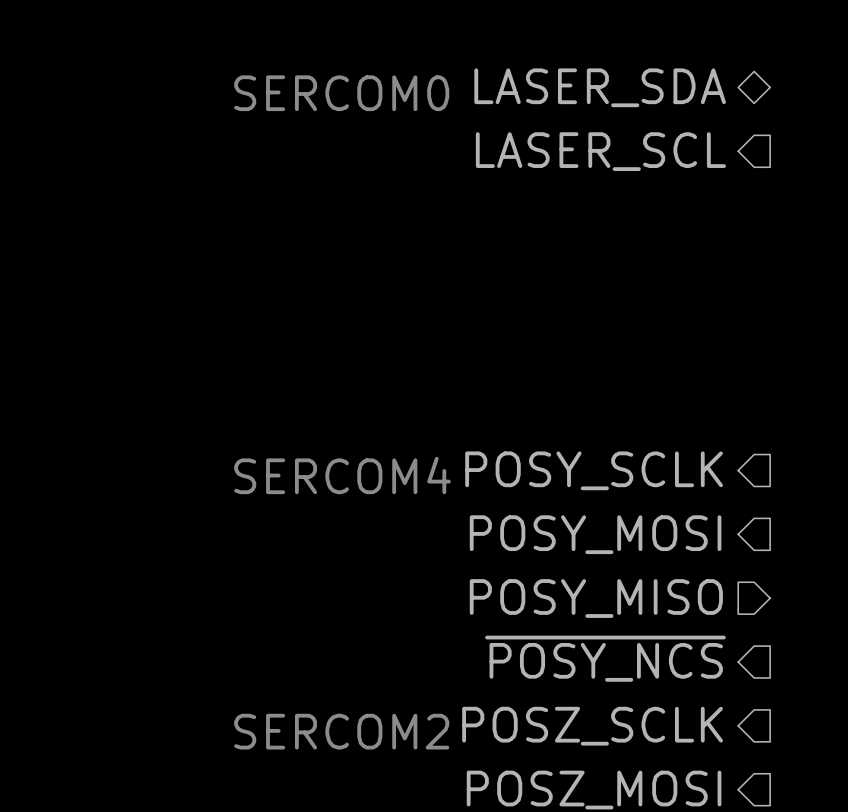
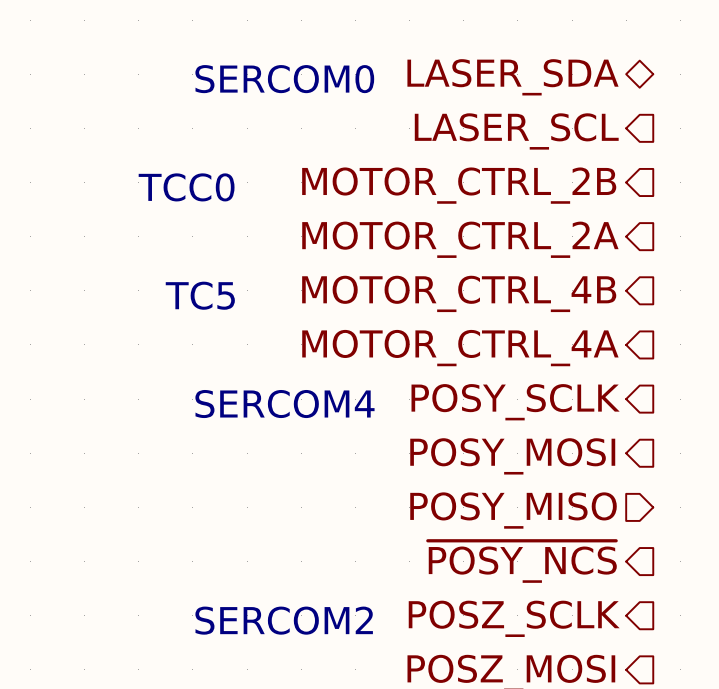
hierarchical label: none -> MOTOR_CTRL_2B (459, 185)
text: none -> TCC0 (186, 187)
hierarchical label: none -> MOTOR_CTRL_2A (460, 239)
hierarchical label: none -> MOTOR_CTRL_4B (459, 293)
text: none -> TC5 (200, 295)
hierarchical label: none -> MOTOR_CTRL_4A (460, 348)

